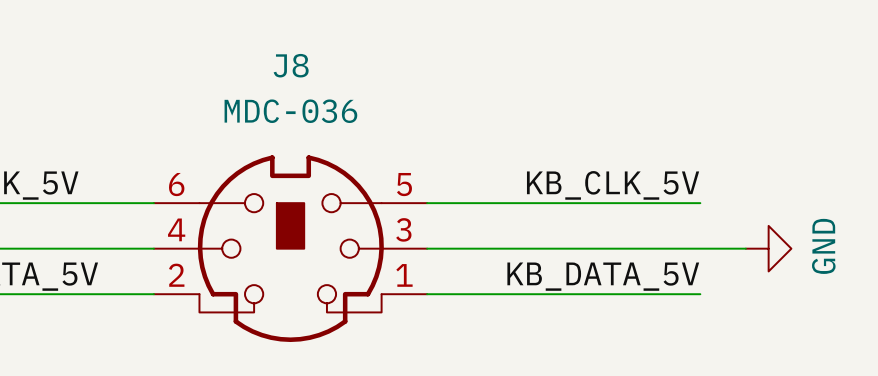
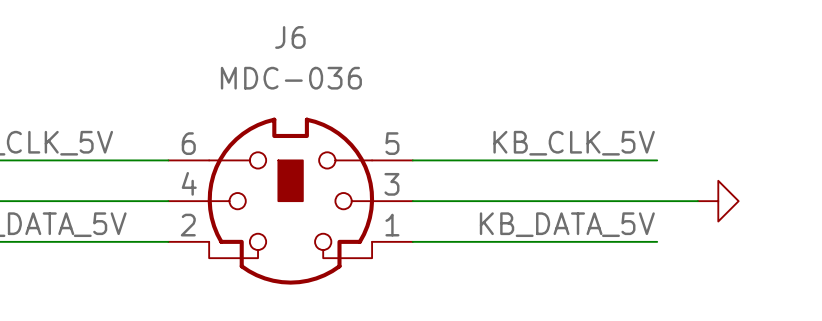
J8 name: J8 (291, 65) -> J6 (290, 37)
power symbol text: GND (823, 246) -> none

